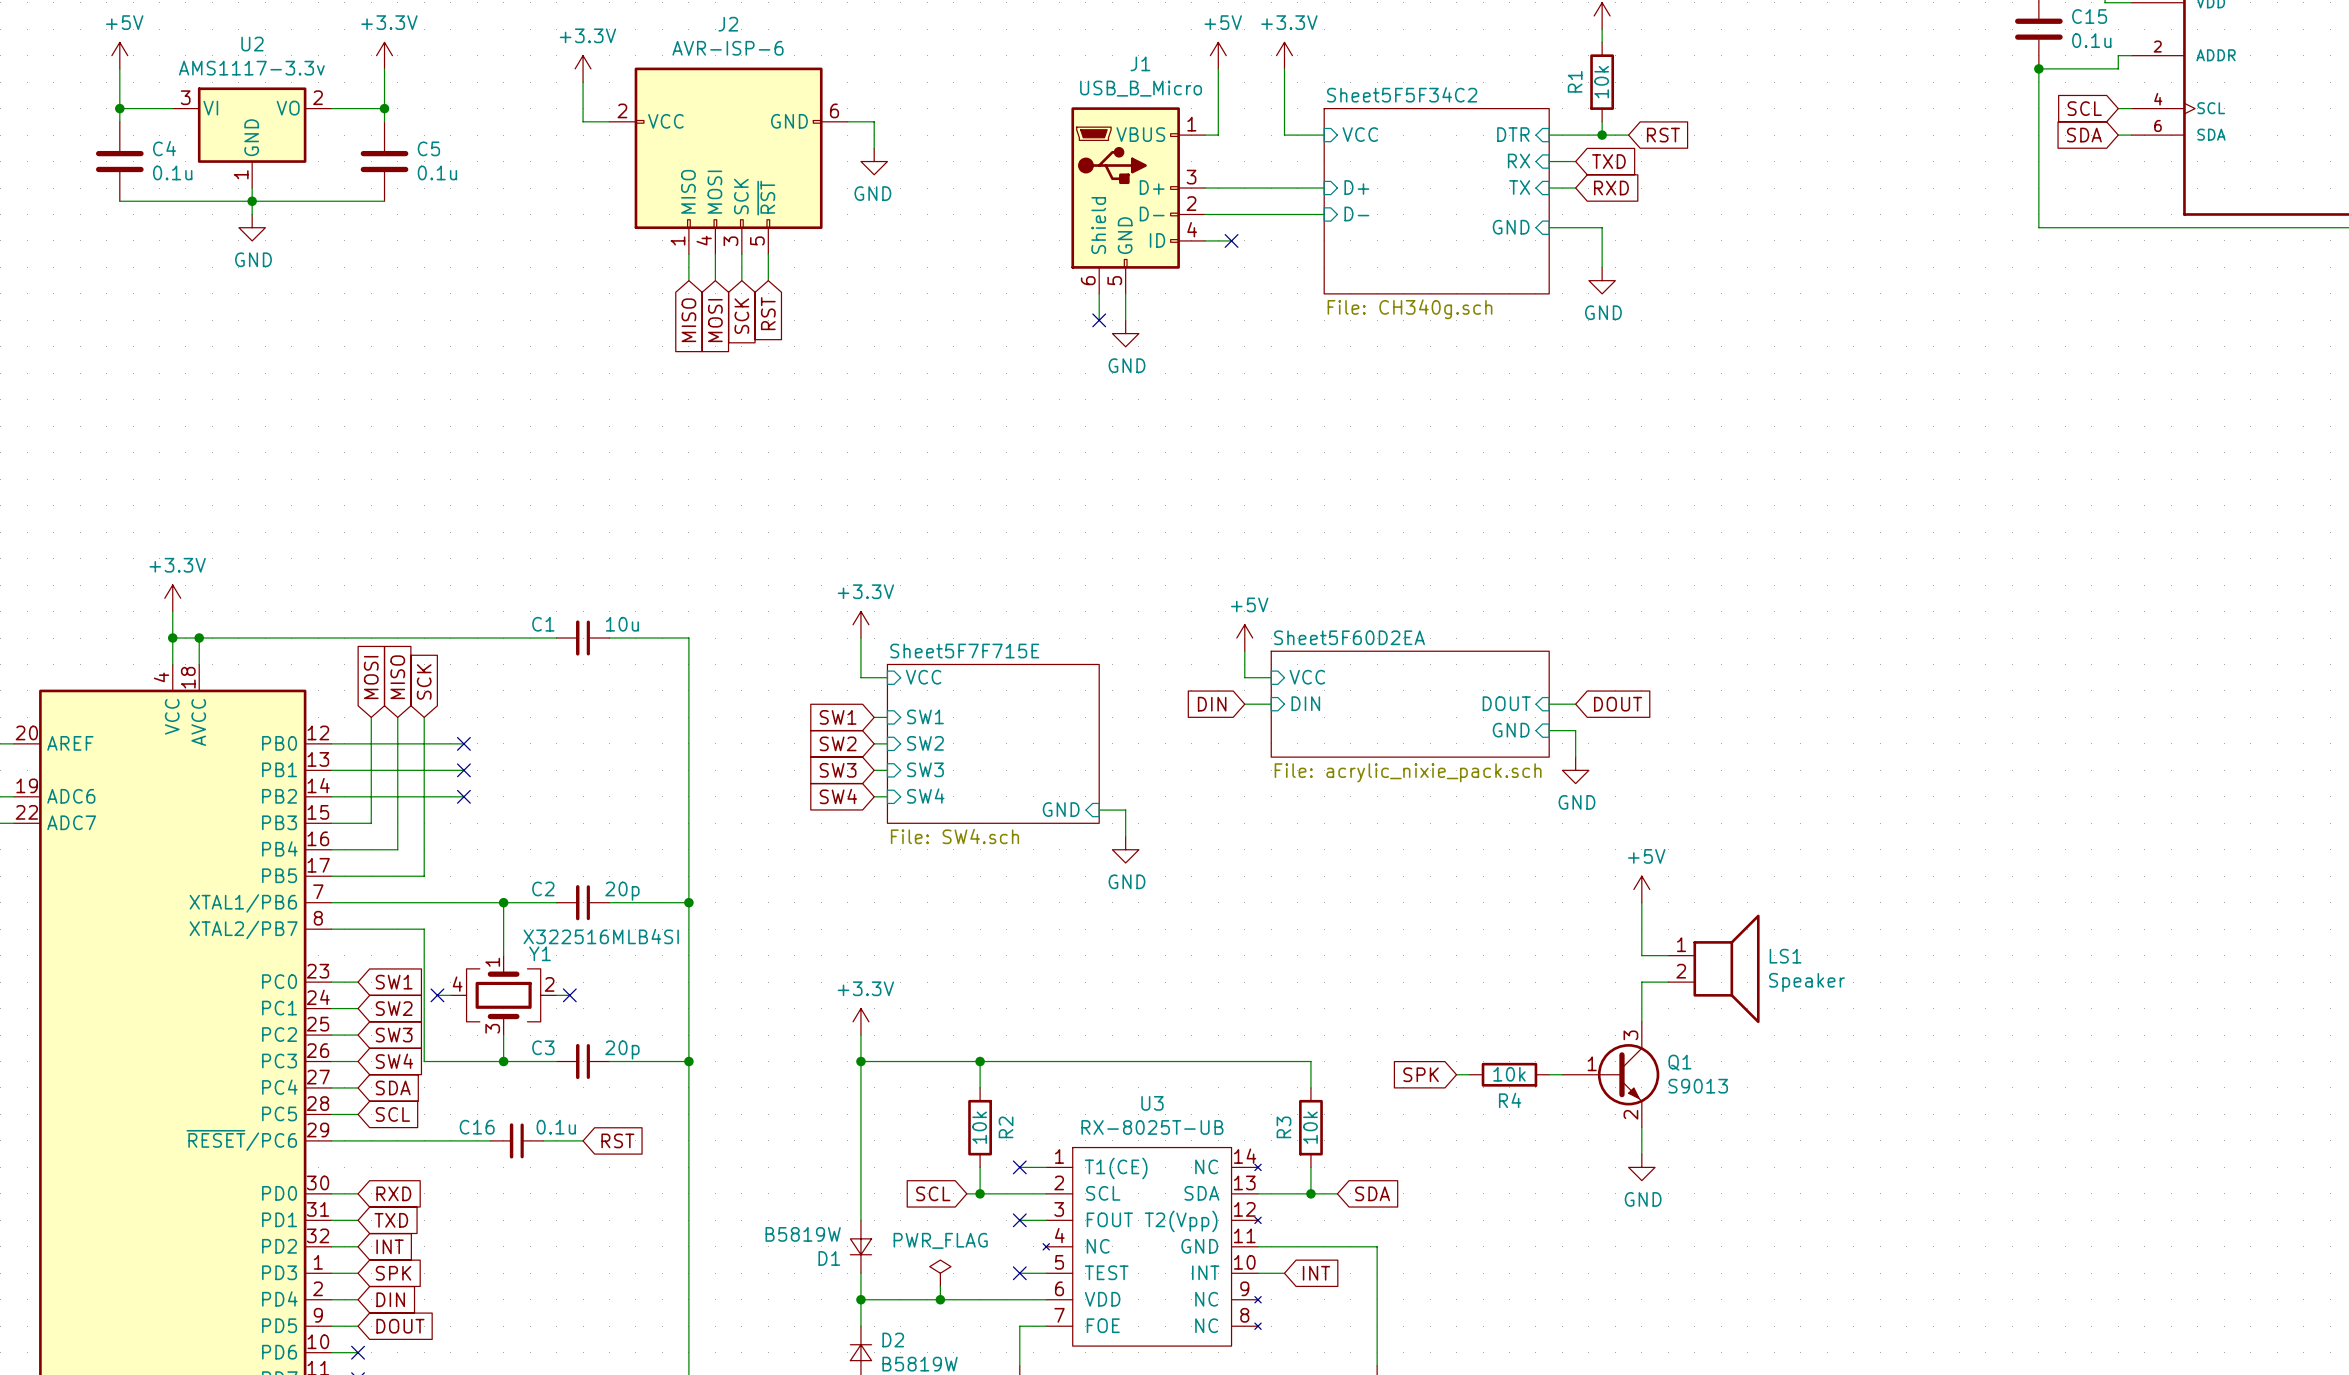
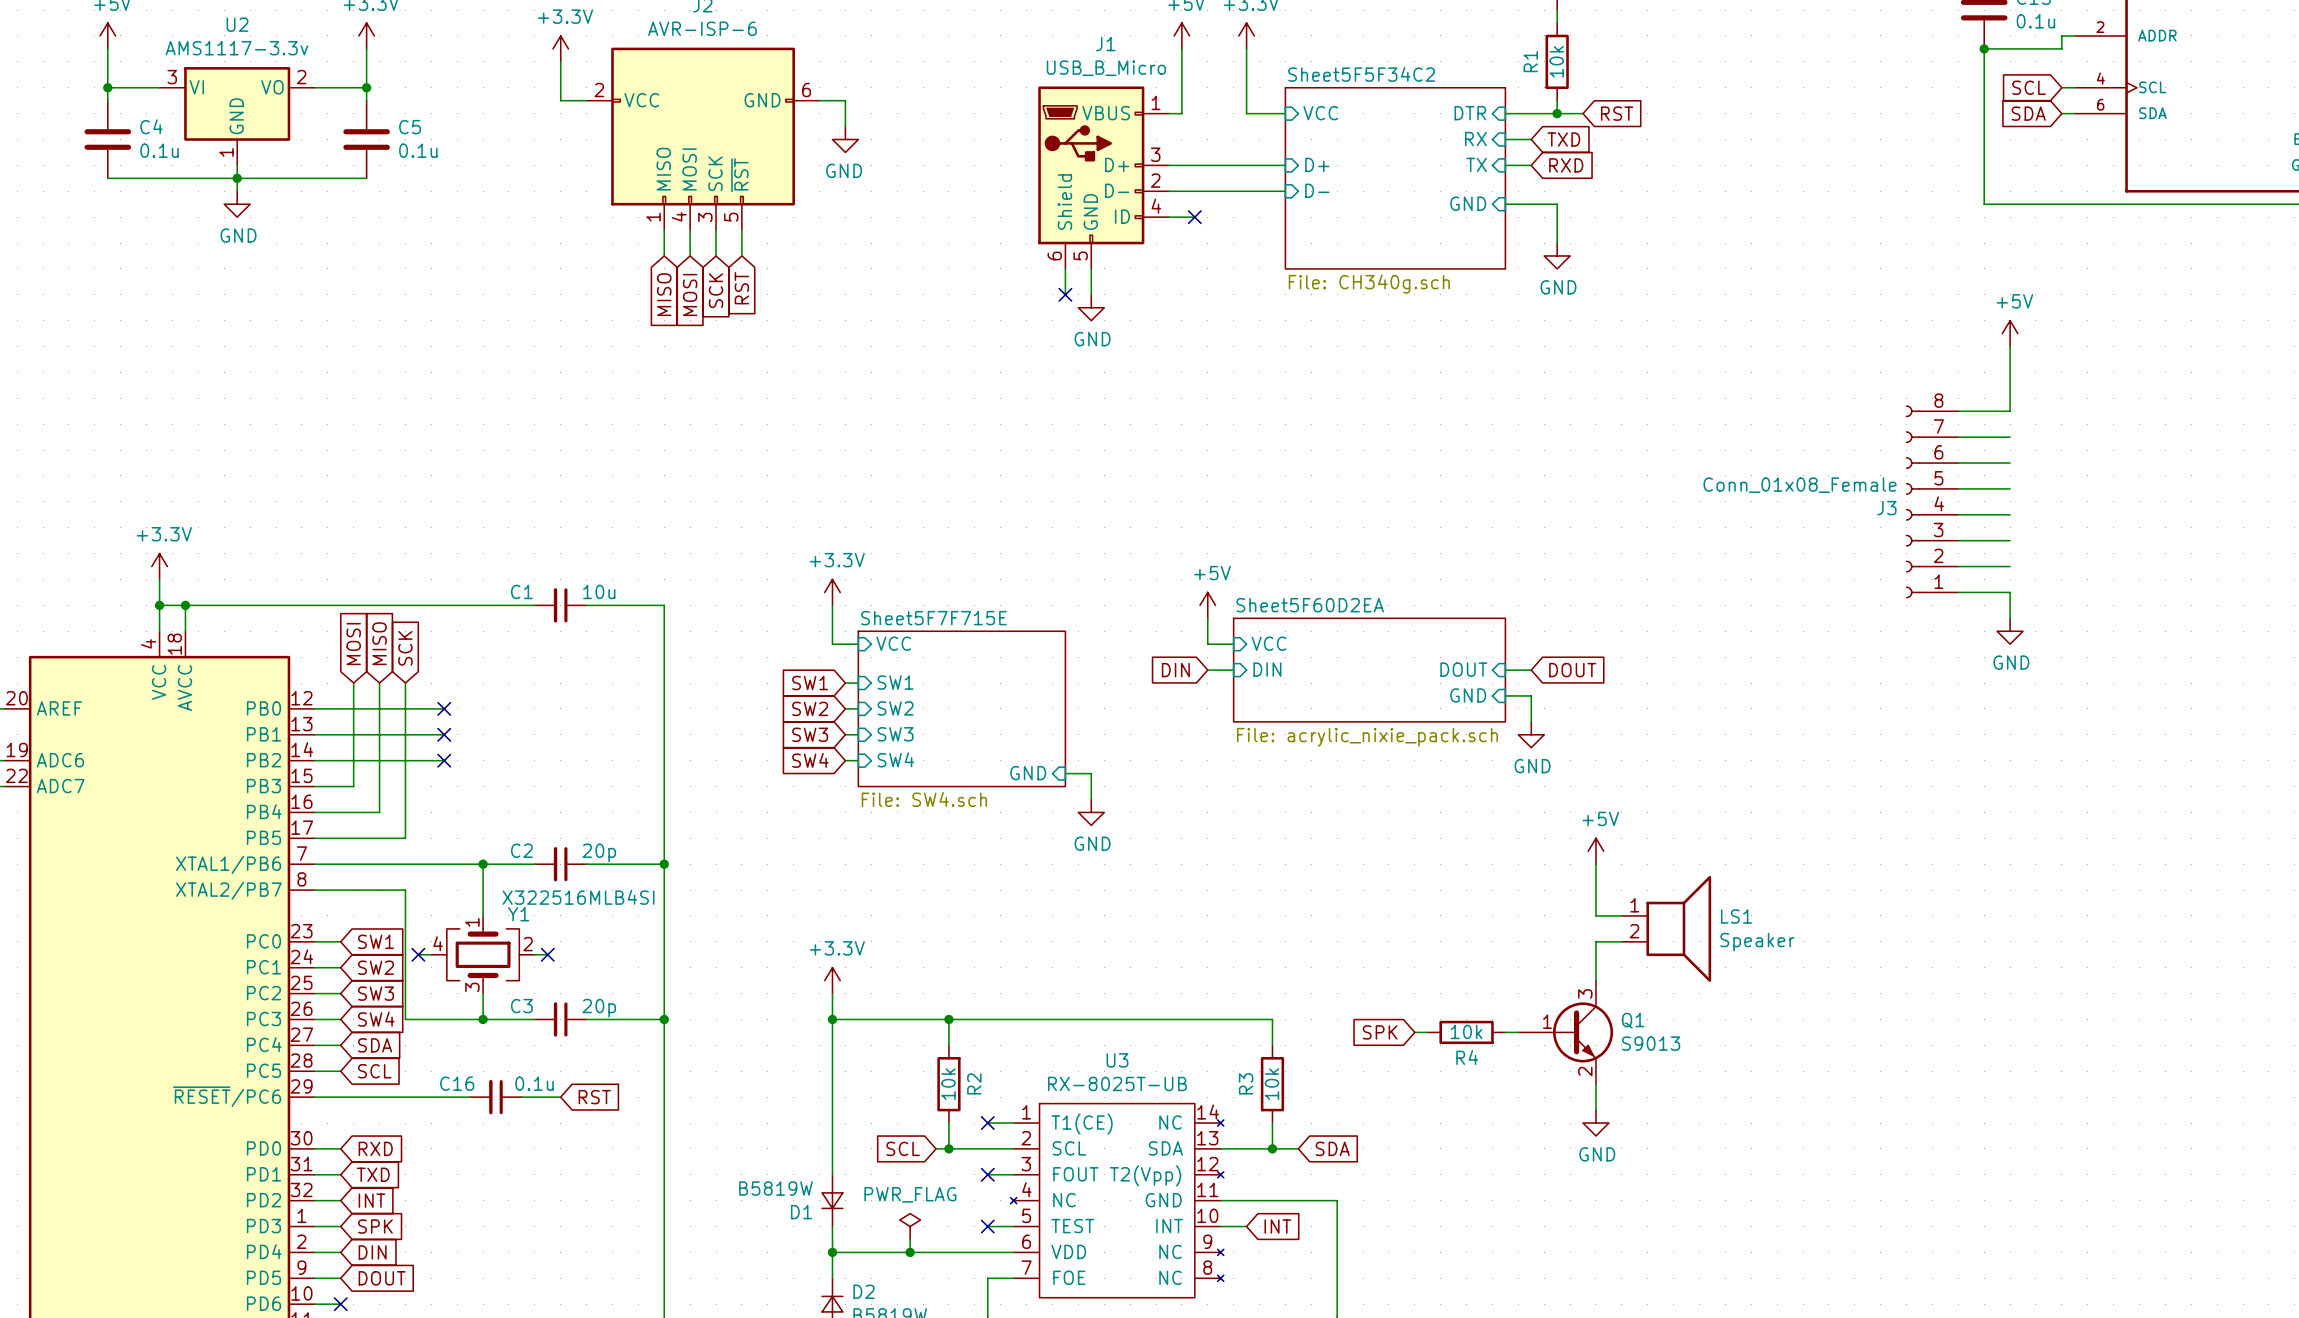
power symbol: none -> +5V (2010, 333)
wire: none -> (2010, 346) (2010, 411) (1958, 411)
wire: none -> (1958, 437) (2010, 437)
wire: none -> (1958, 463) (2010, 463)
wire: none -> (1958, 488) (2010, 488)
J3: none -> Conn_01x08_Female (1932, 501)
wire: none -> (1958, 514) (2010, 514)
wire: none -> (1958, 540) (2010, 540)
wire: none -> (1958, 566) (2010, 566)
wire: none -> (1958, 592) (2010, 592) (2010, 618)
power symbol: none -> GND (2010, 631)

